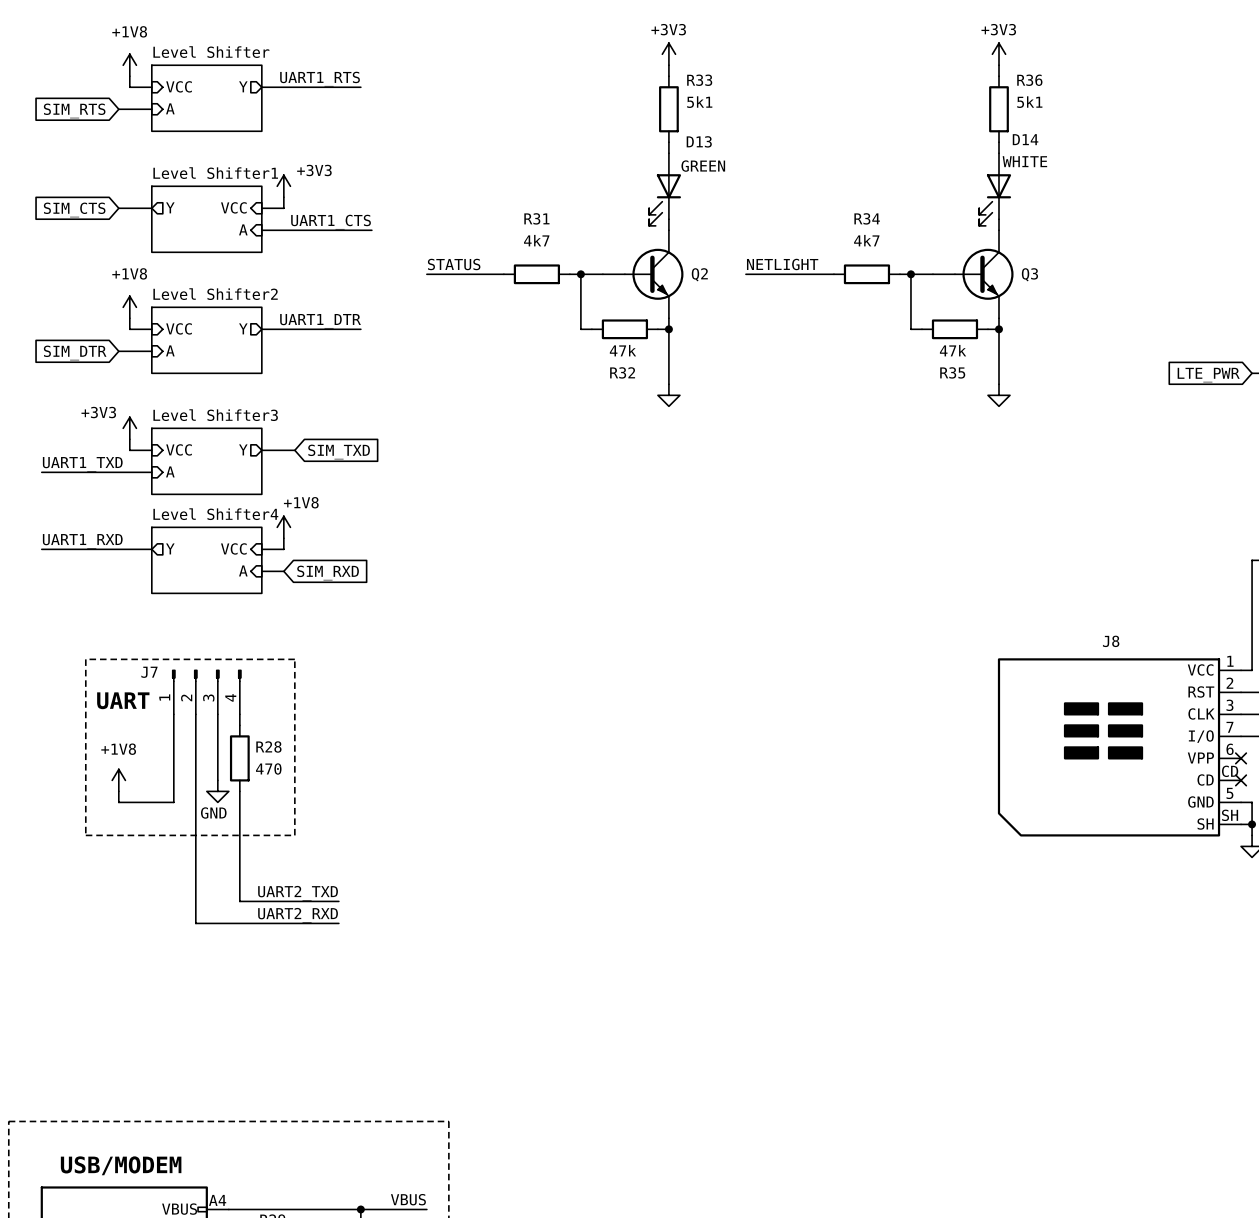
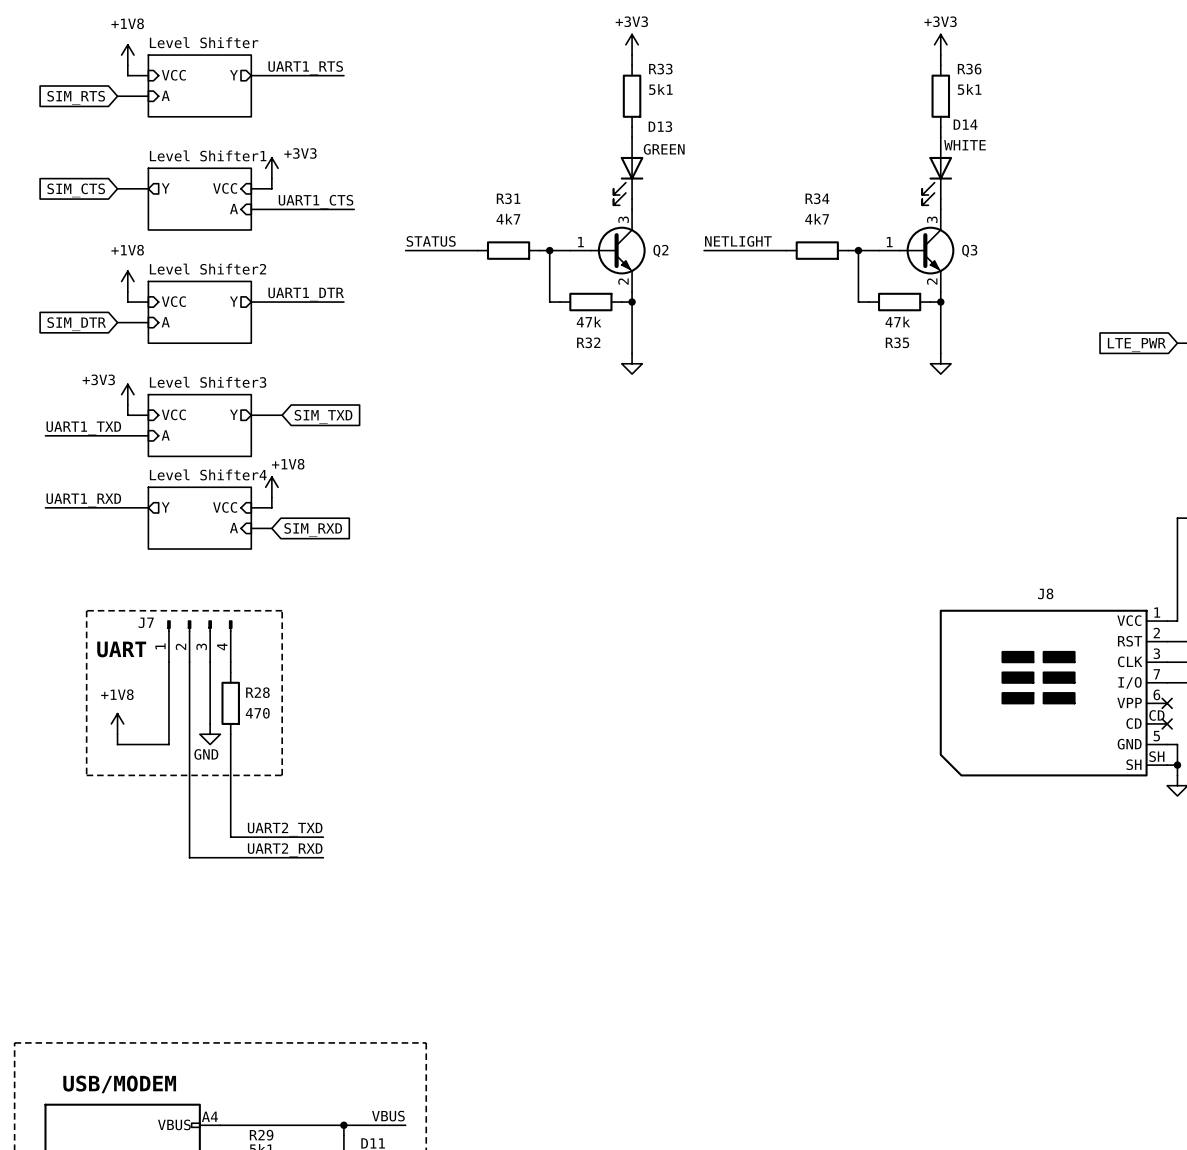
Q2 pin number: none -> 3 (623, 219)
Q3 pin number: none -> 3 (932, 219)
Q2 pin number: none -> 1 (580, 242)
Q3 pin number: none -> 1 (889, 242)
Q2 pin number: none -> 2 (623, 281)
Q3 pin number: none -> 2 (932, 281)

